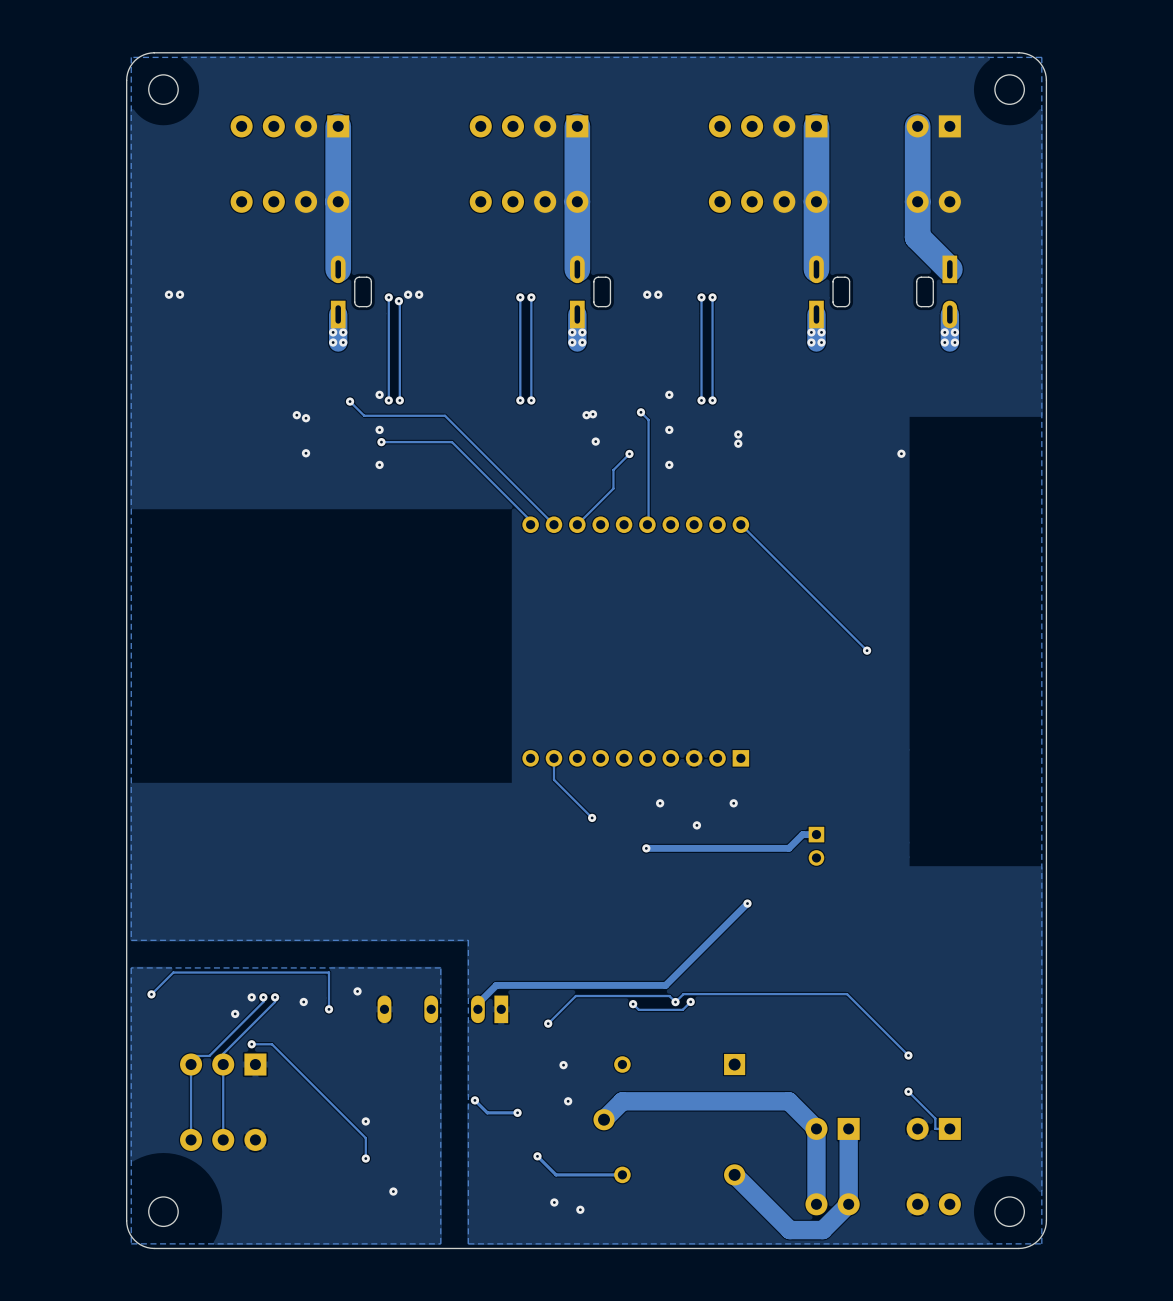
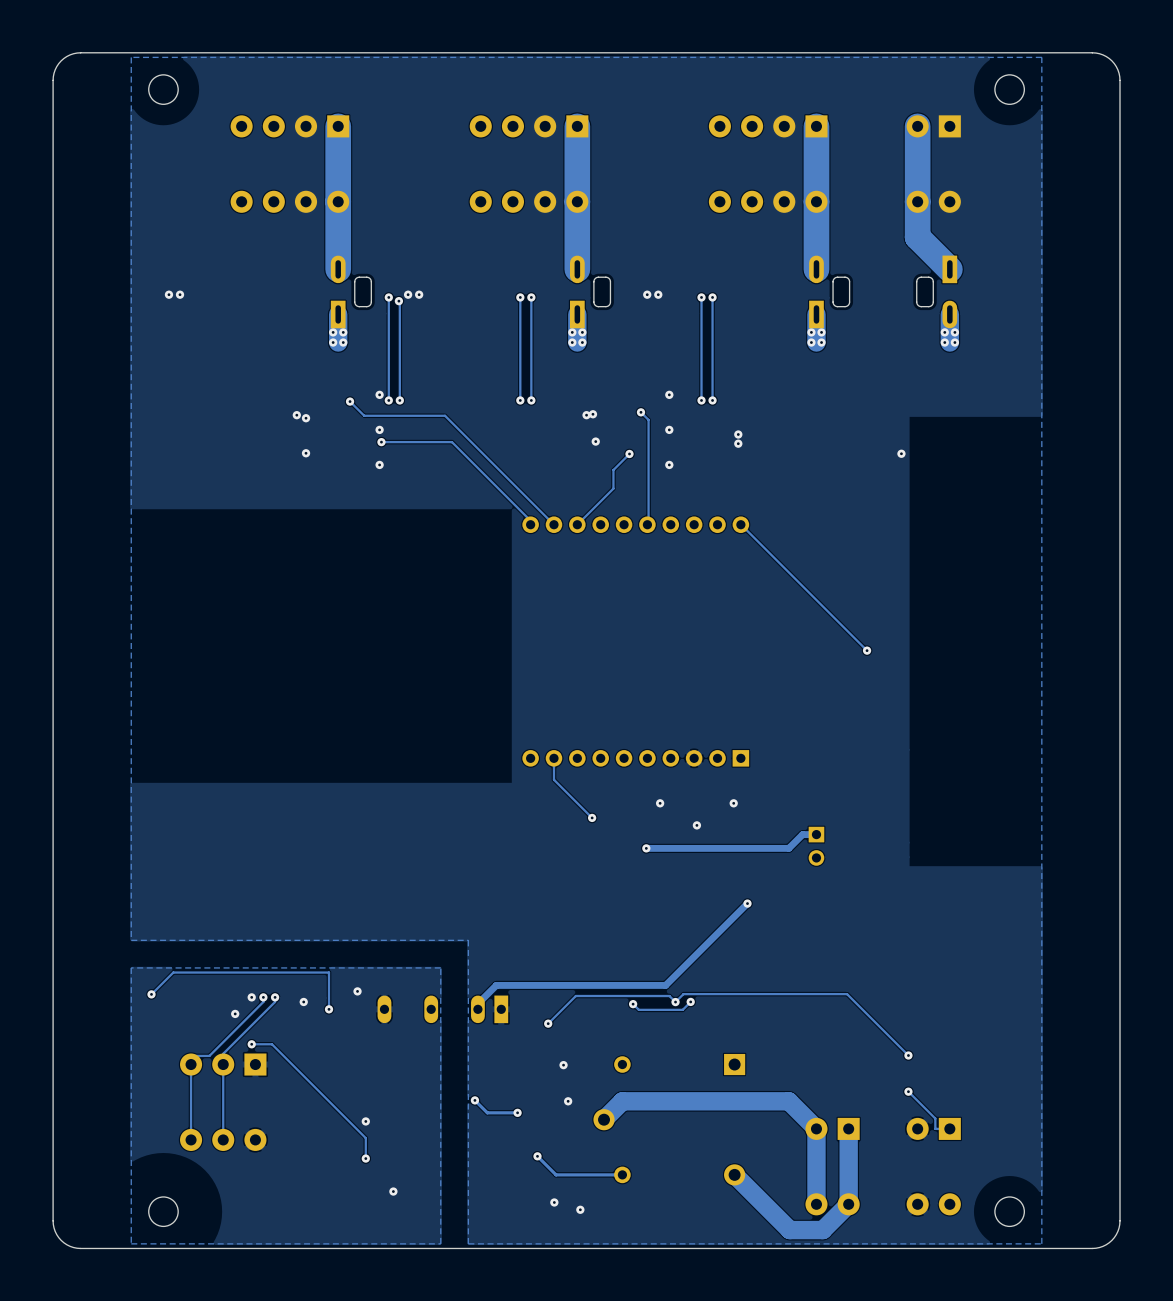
board edge: (154, 52) (143, 54) (134, 60) (128, 69) (126, 80) (126, 1220) (128, 1231) (134, 1240) (143, 1246) (154, 1248) -> (154, 52) (73, 53) (58, 63) (53, 80) (53, 1224) (58, 1237) (73, 1247) (154, 1248)
board edge: (1018, 52) (1029, 54) (1038, 60) (1044, 69) (1046, 80) (1046, 1220) (1044, 1231) (1038, 1240) (1029, 1246) (1018, 1248) -> (1018, 52) (1099, 53) (1114, 63) (1119, 80) (1119, 1224) (1111, 1240) (1099, 1247) (1018, 1248)

